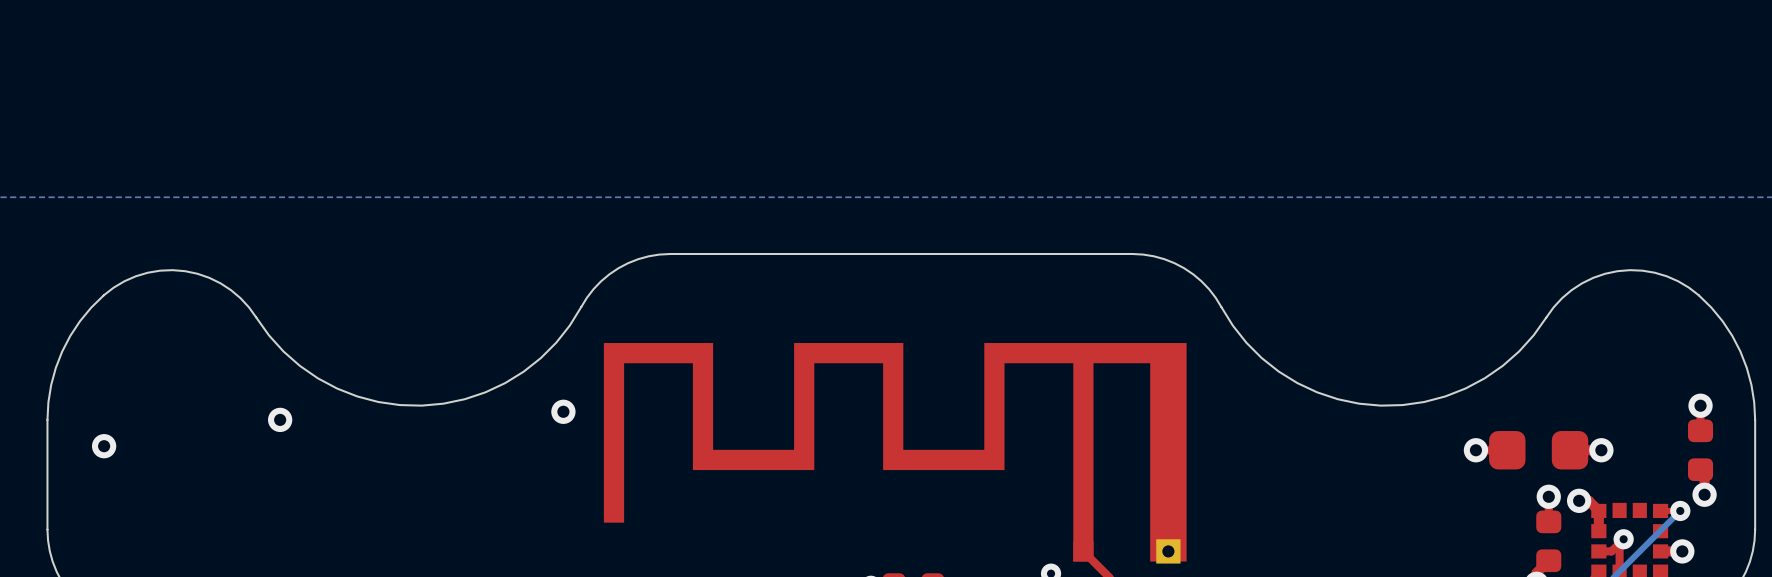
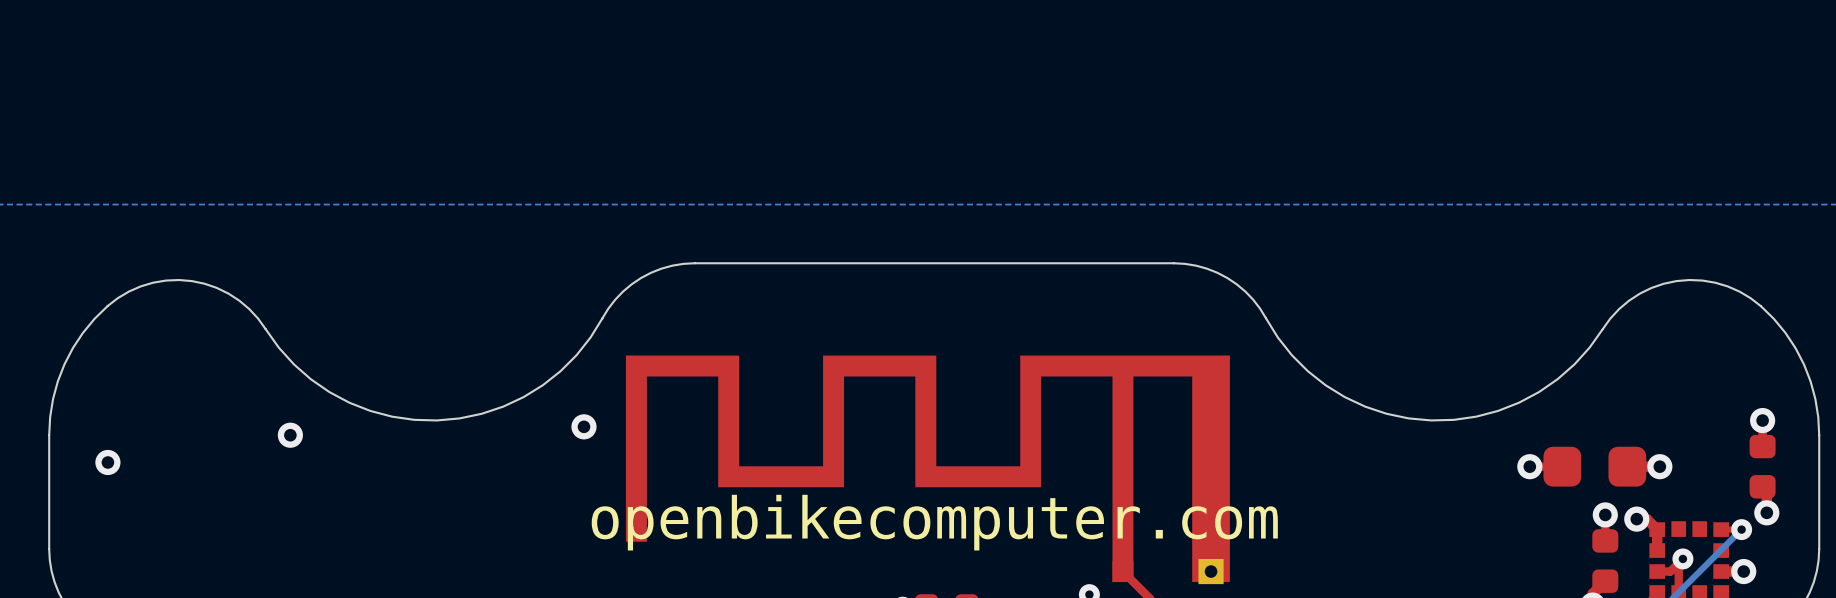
text: none -> openbikecomputer.com (934, 522)

